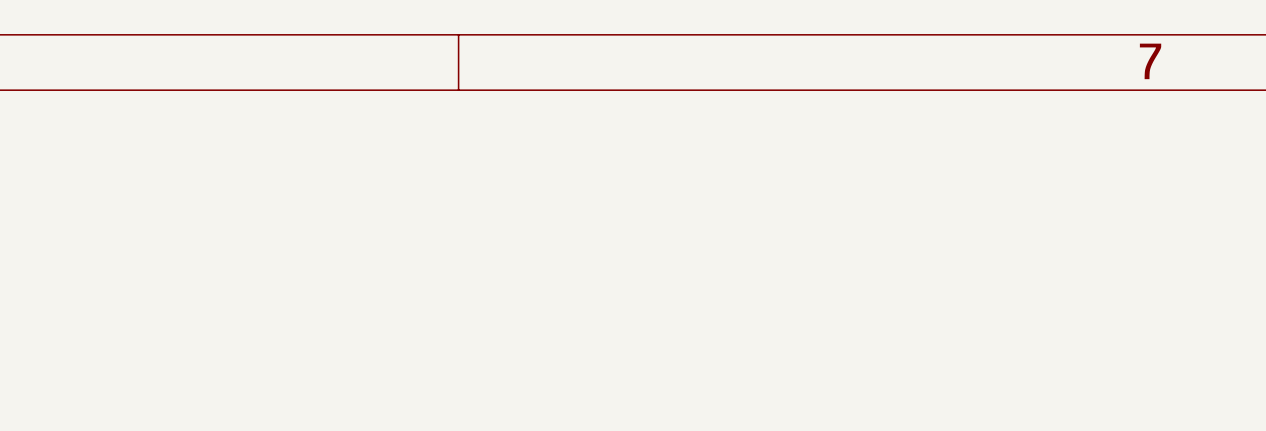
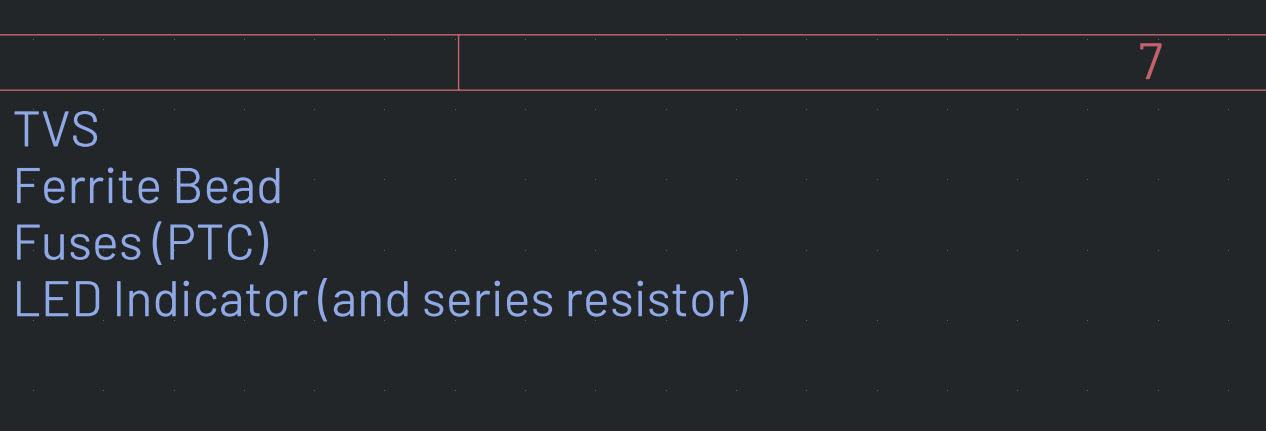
text: none -> TVS (55, 128)
text: none -> Ferrite Bead (148, 185)
text: none -> Fuses (PTC) (142, 243)
text: none -> LED Indicator (and series resistor) (382, 299)

